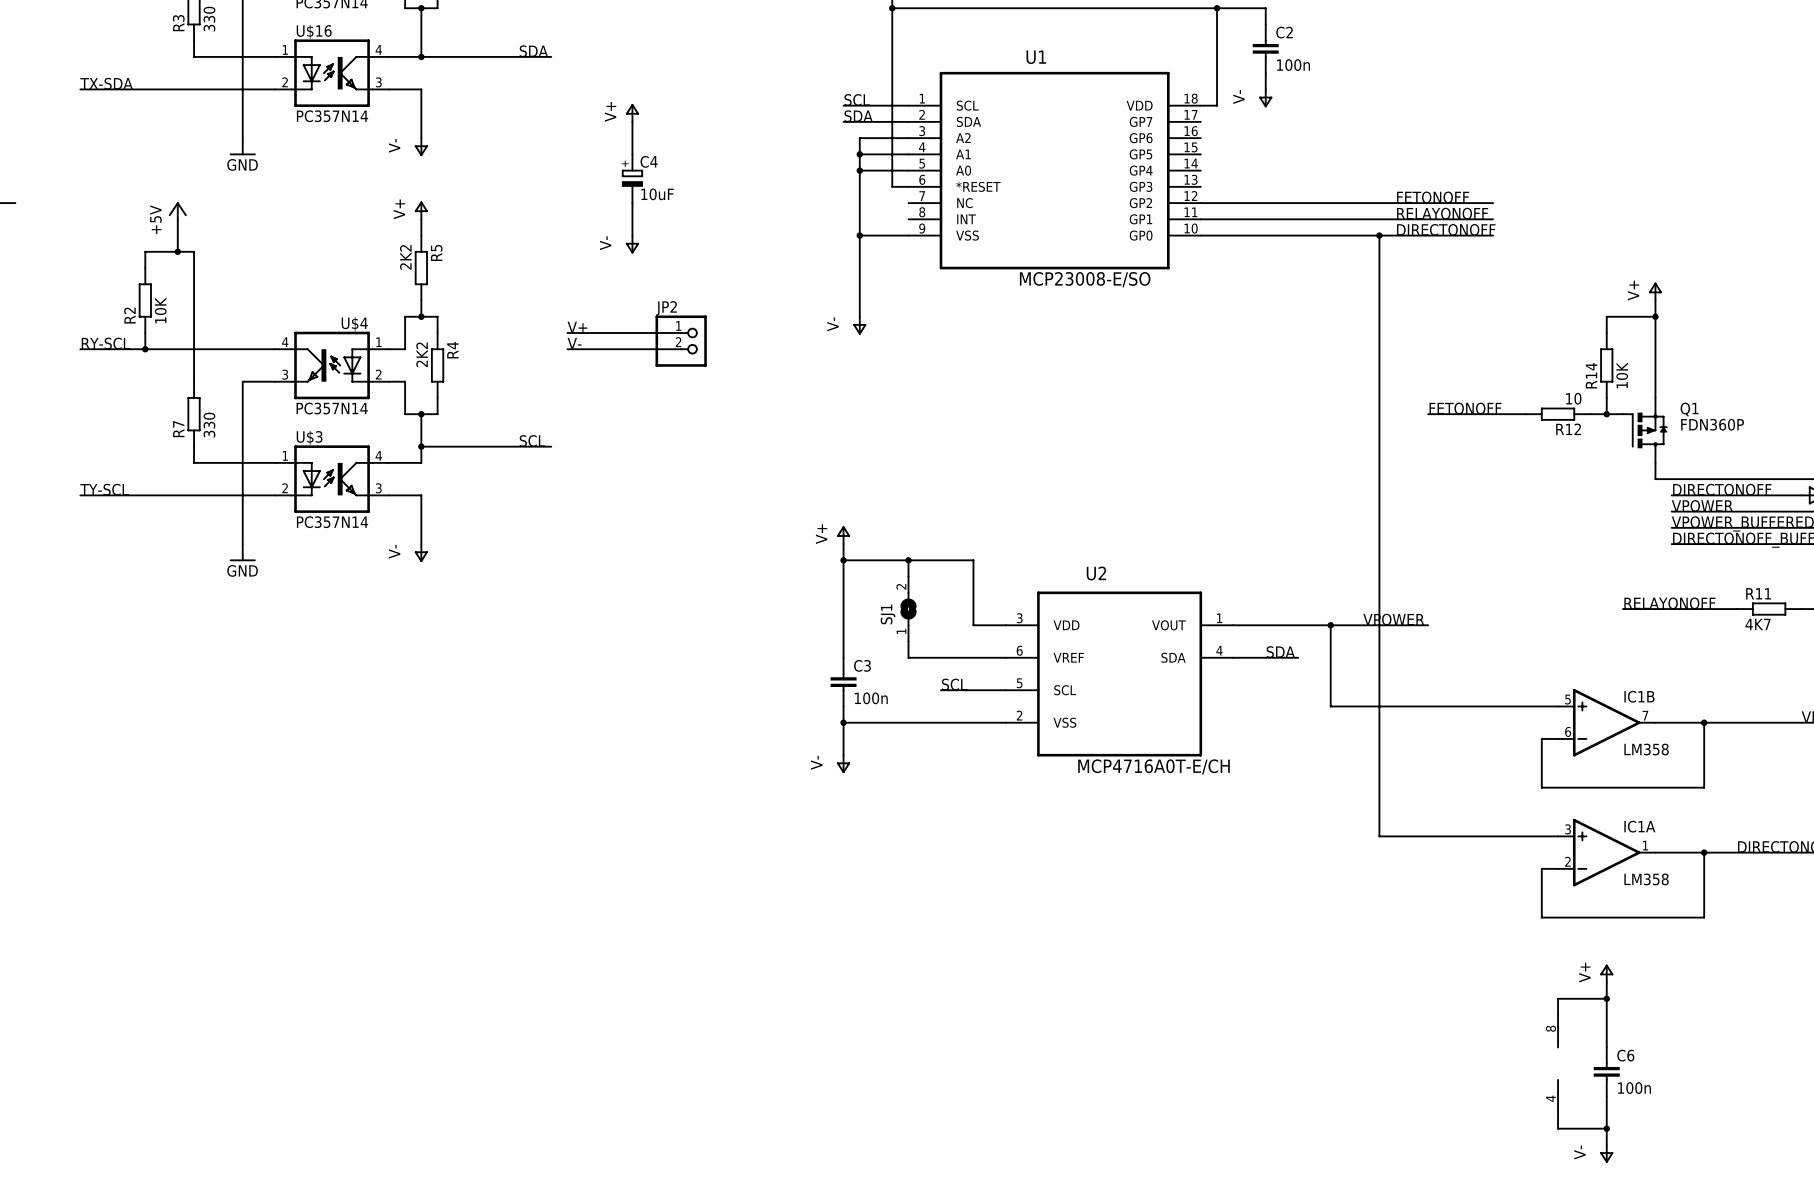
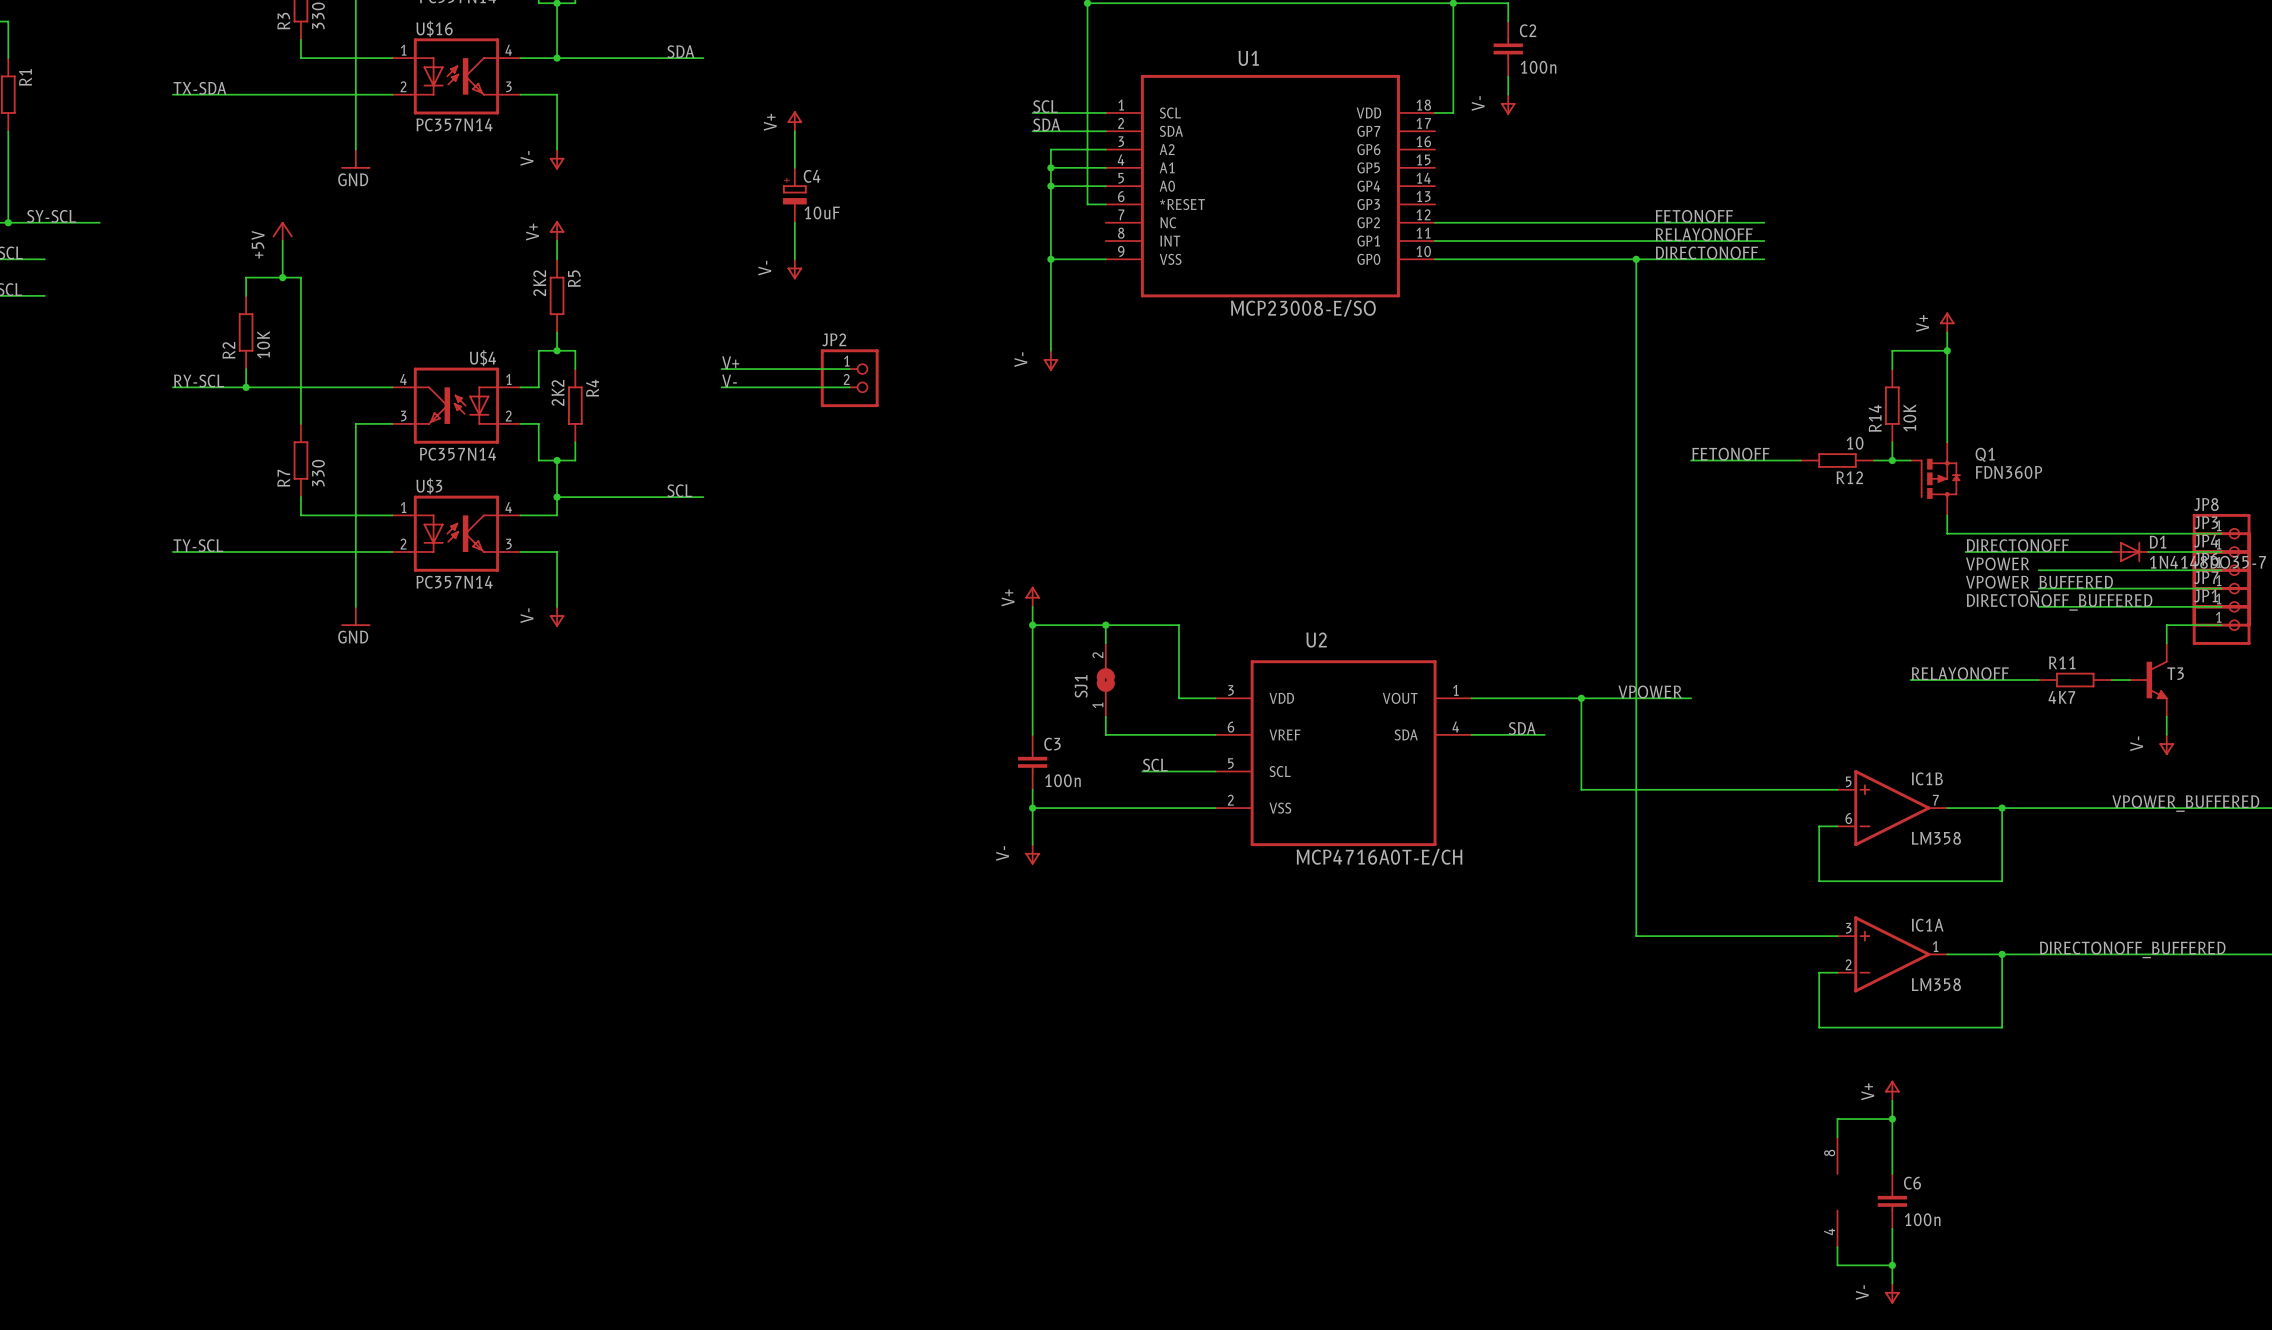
wire: (1671, 511) (1736, 511) -> none
wire: (1671, 527) (1736, 527) -> none
wire: (1671, 544) (1736, 544) -> none

